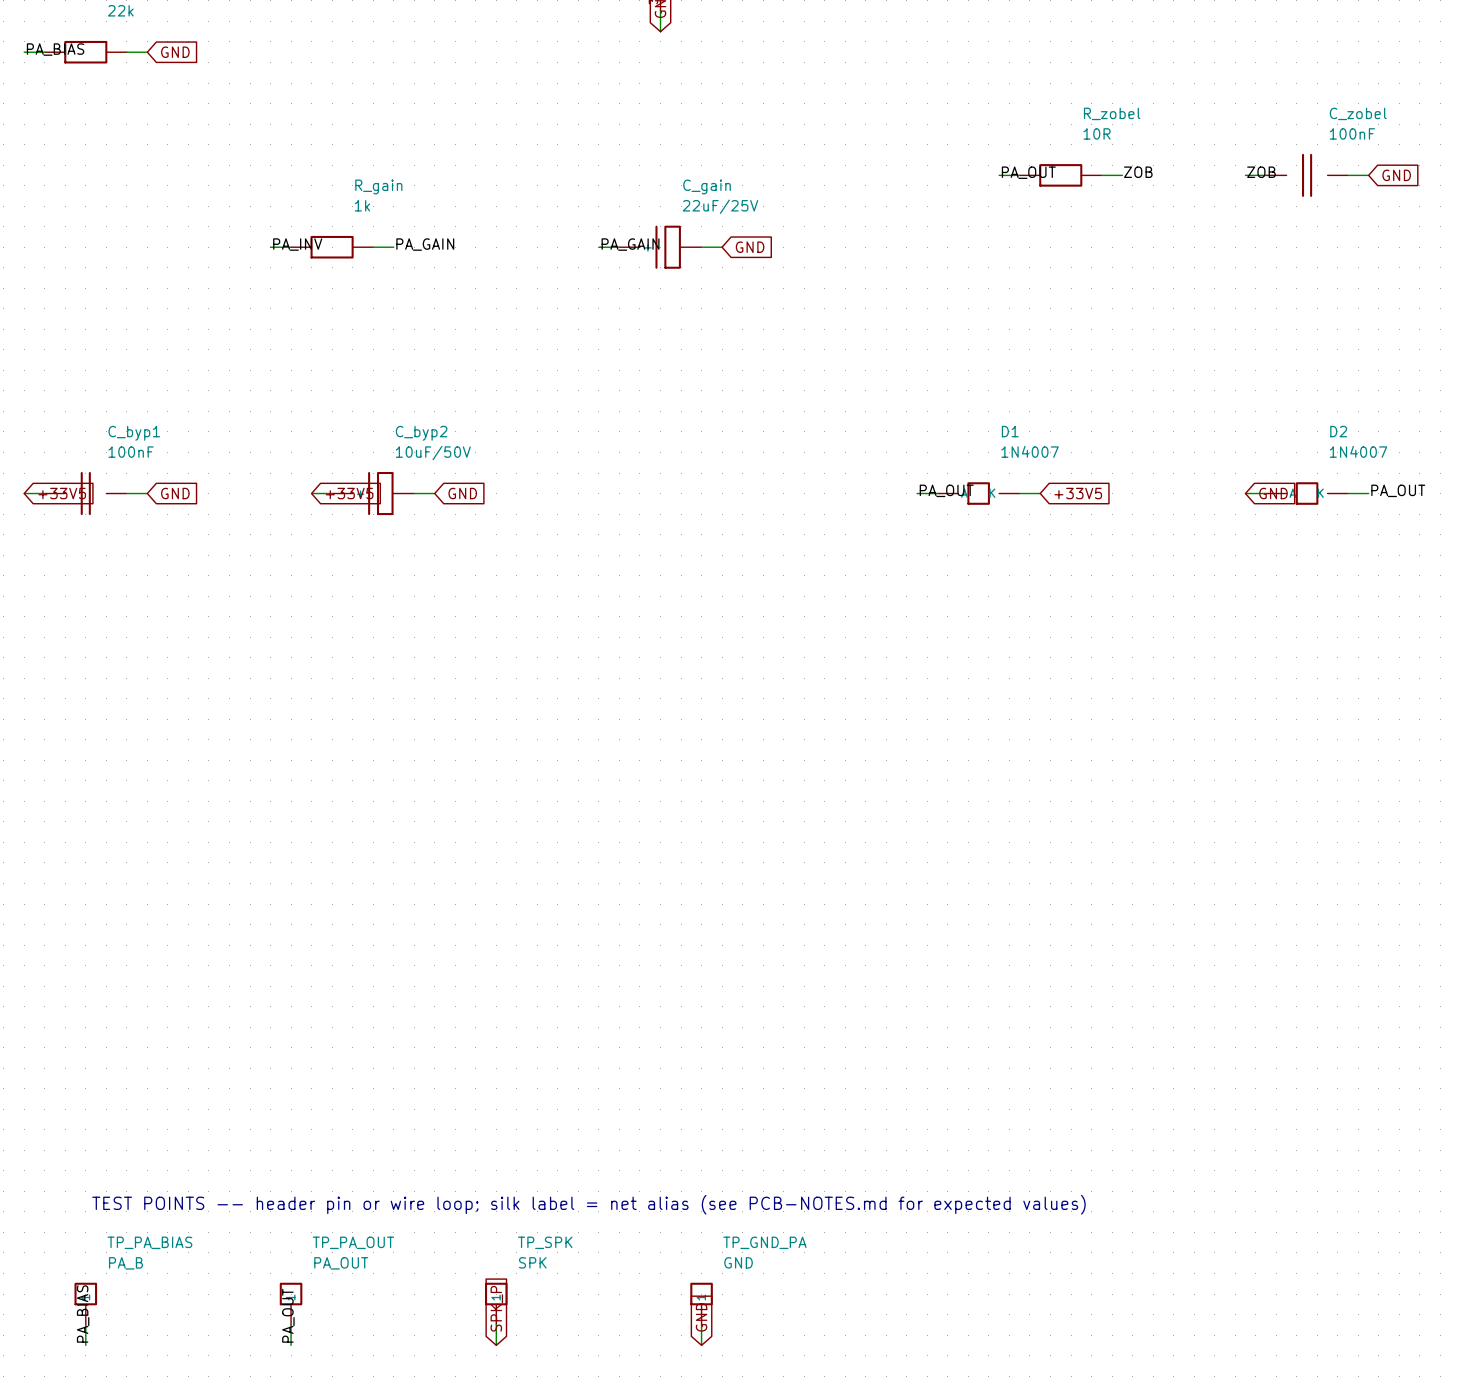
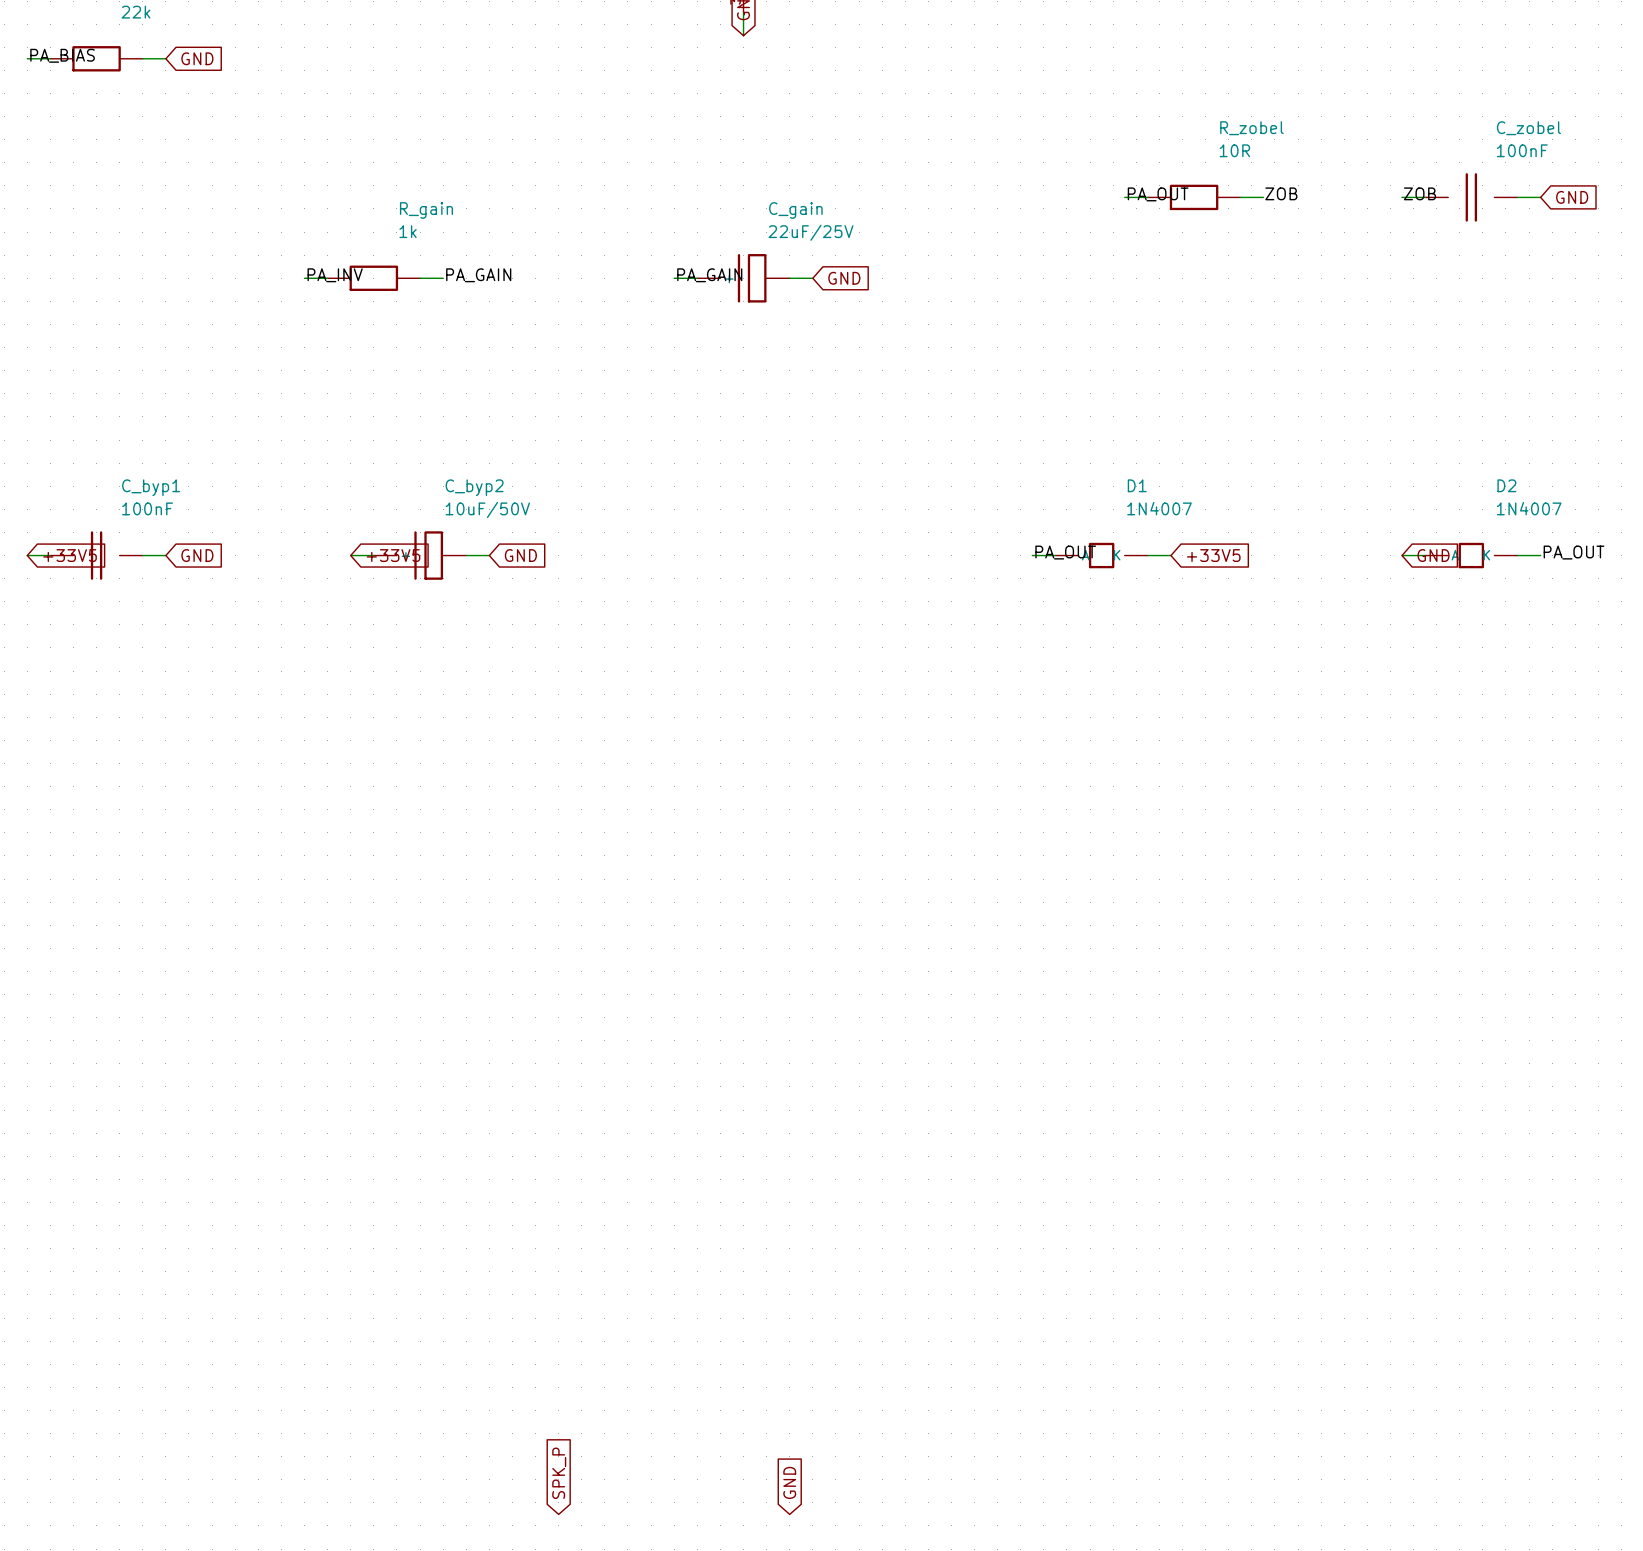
text: TEST POINTS -- header pin or wire loop; silk label = net alias (see PCB-NOTES.md for expected values) (588, 1204) -> none
TP_PA_BIAS: PA_B (85, 1303) -> none
TP_PA_OUT: PA_OUT (291, 1303) -> none
TP_SPK: SPK (496, 1303) -> none
TP_GND_PA: GND (701, 1303) -> none
label: PA_BIAS (83, 1313) -> none
label: PA_OUT (288, 1315) -> none
wire: (85, 1324) (85, 1345) -> none
wire: (291, 1324) (291, 1345) -> none
wire: (496, 1324) (496, 1345) -> none
wire: (701, 1324) (701, 1345) -> none

